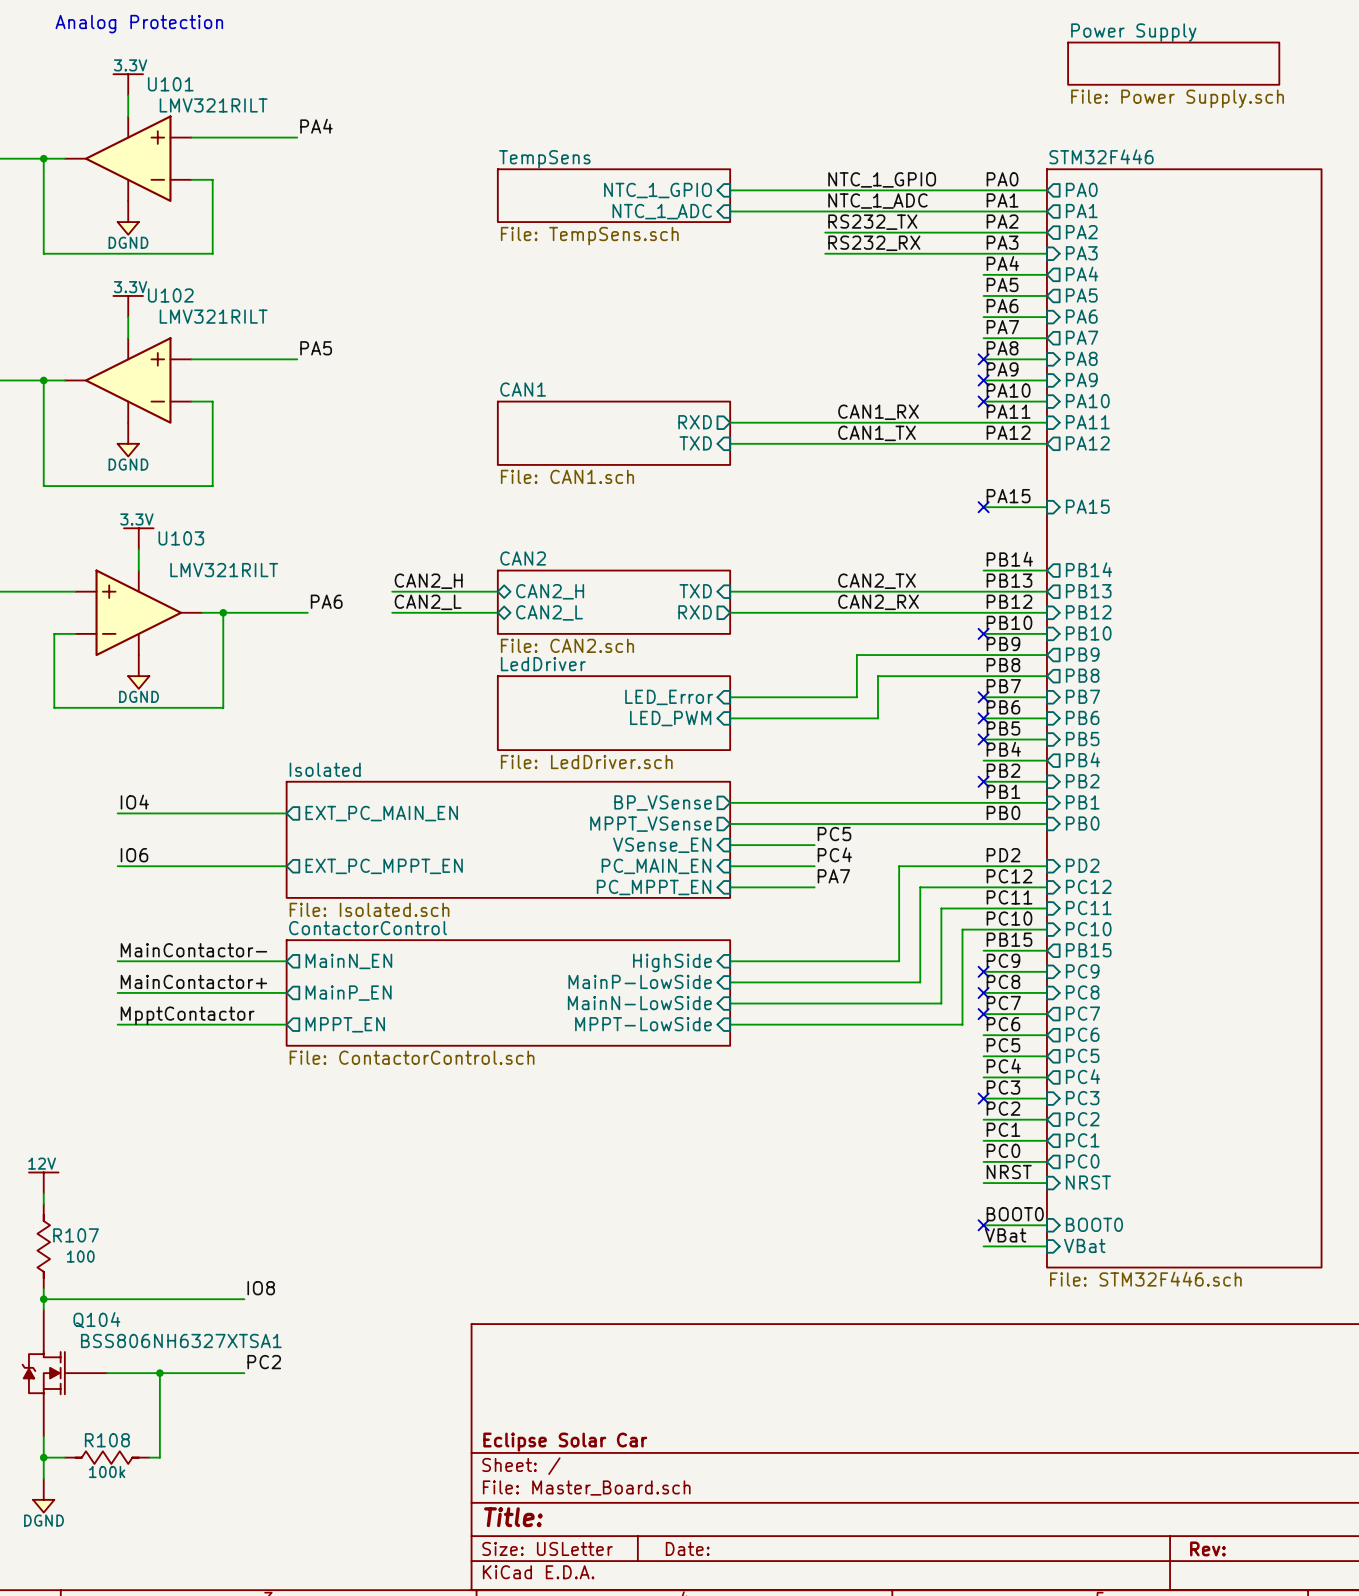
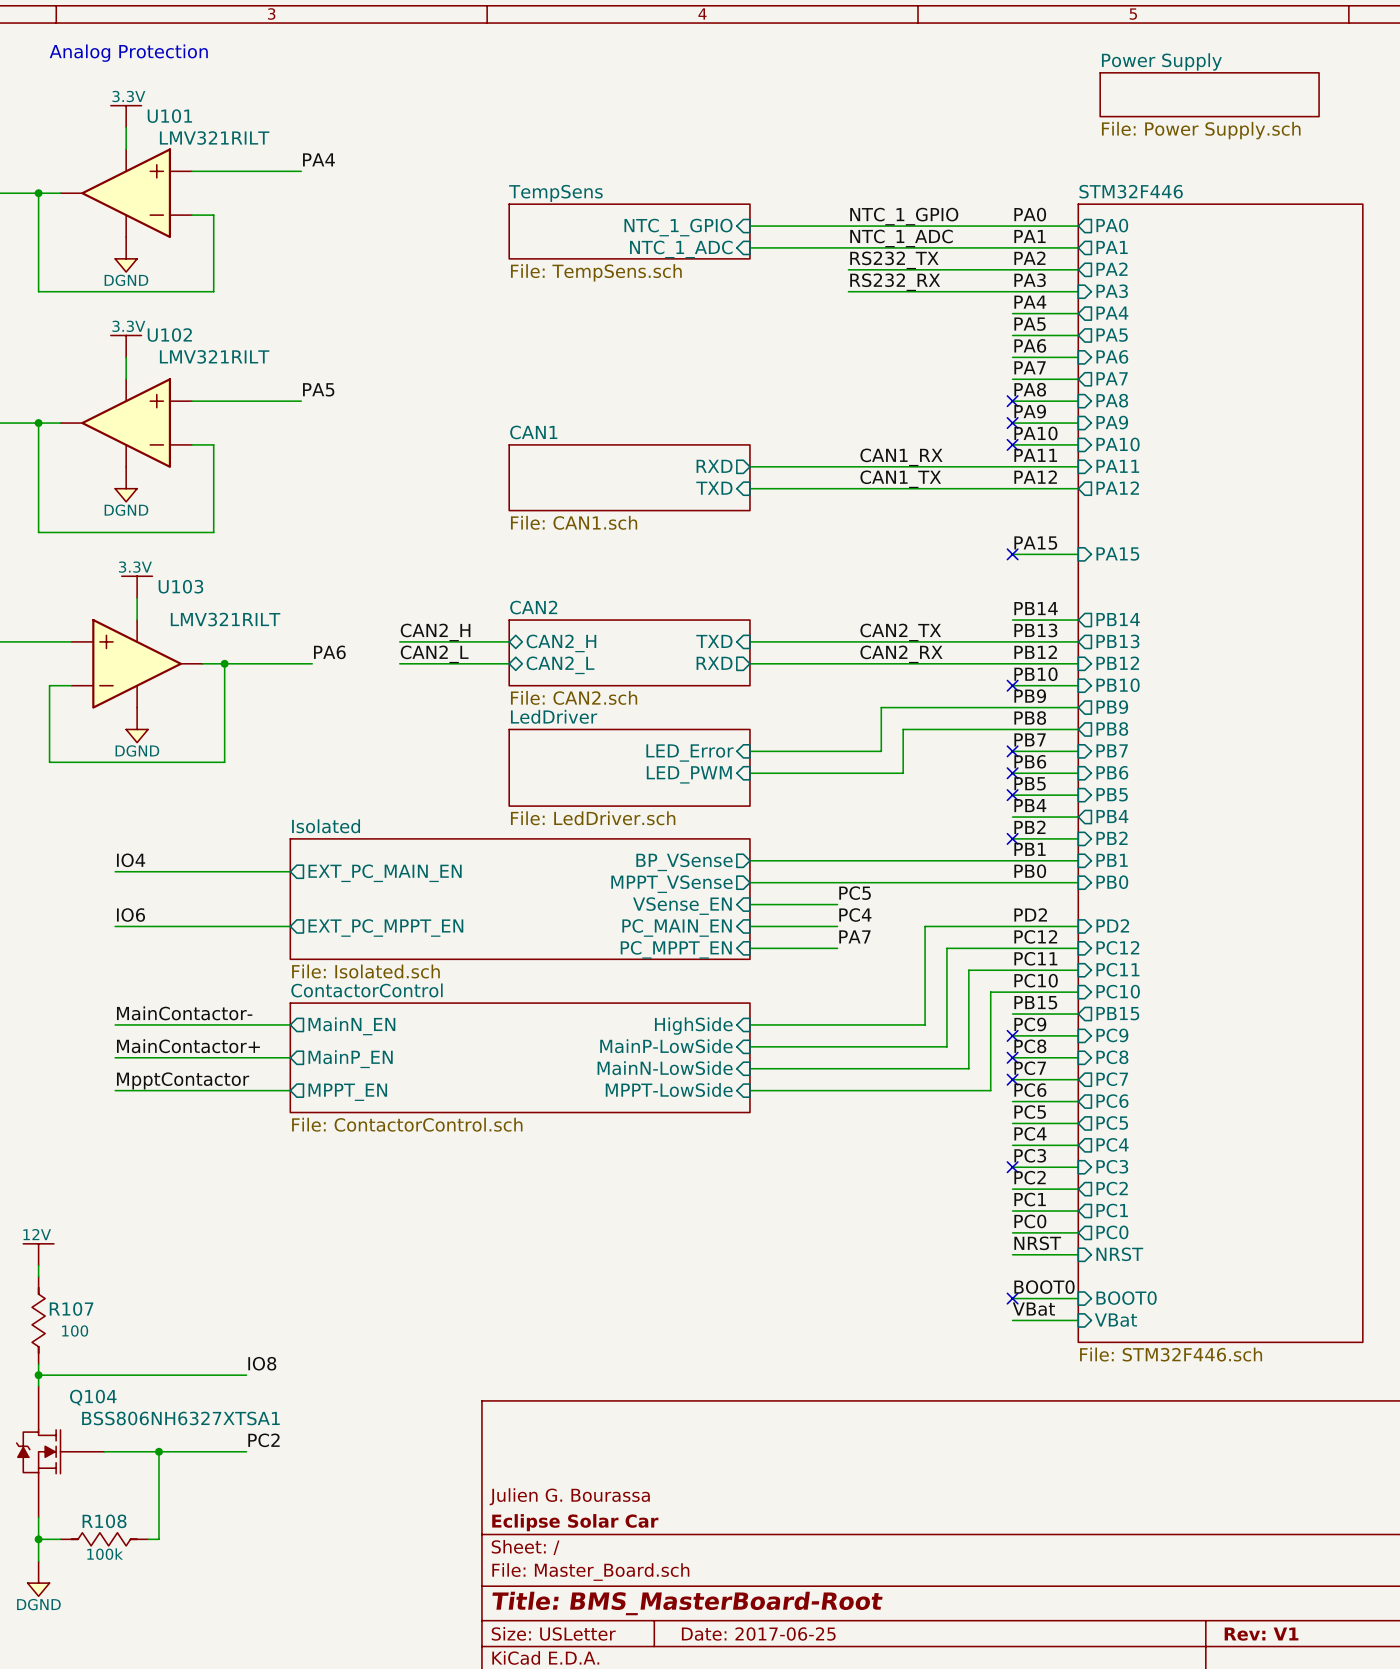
title block: none -> Julien G. Bourassa (569, 1496)
title block: Title: (513, 1517) -> Title: BMS_MasterBoard-Root (687, 1603)
title block: Date: (687, 1548) -> Date: 2017-06-25 (758, 1633)
title block: Rev: (1207, 1548) -> Rev: V1 (1261, 1634)

